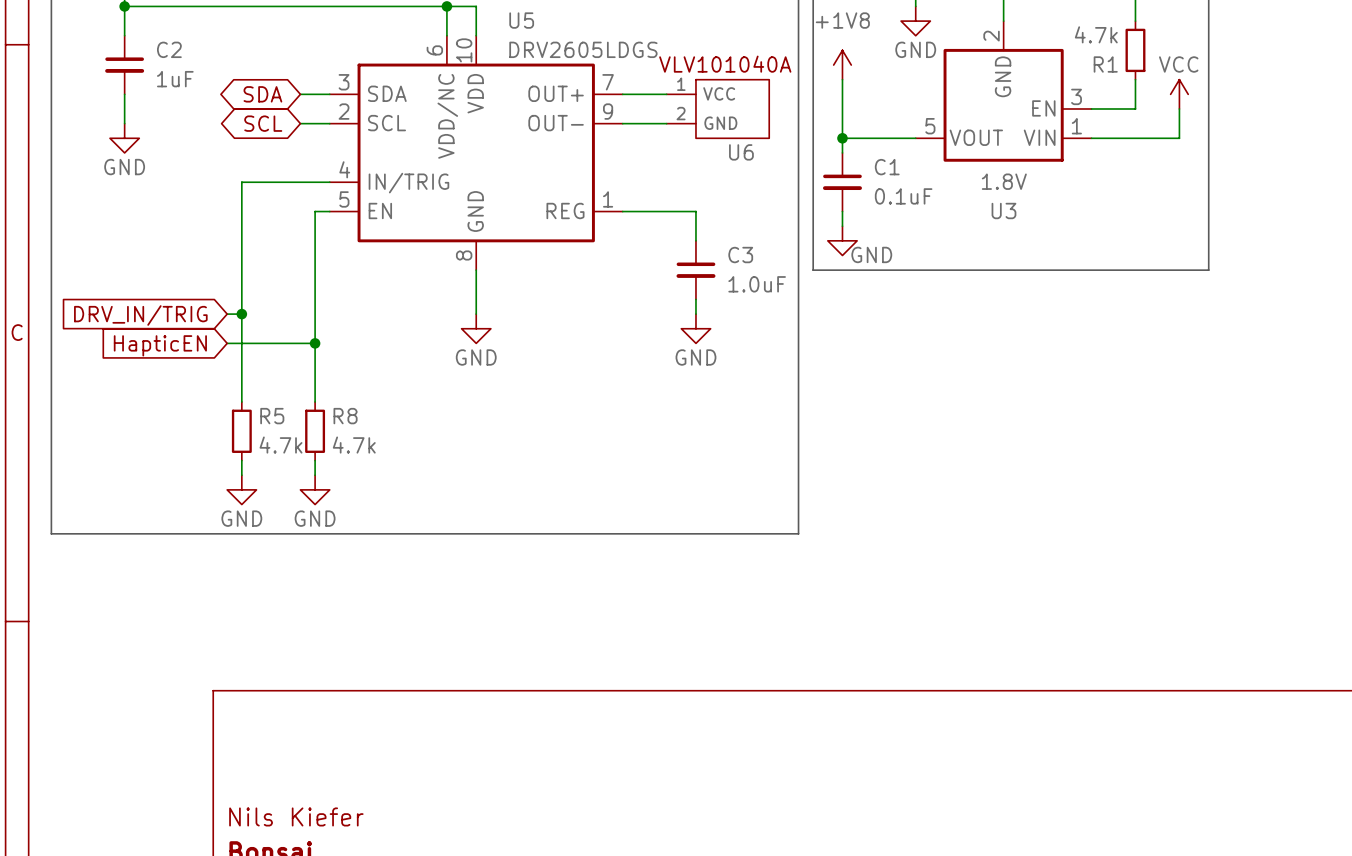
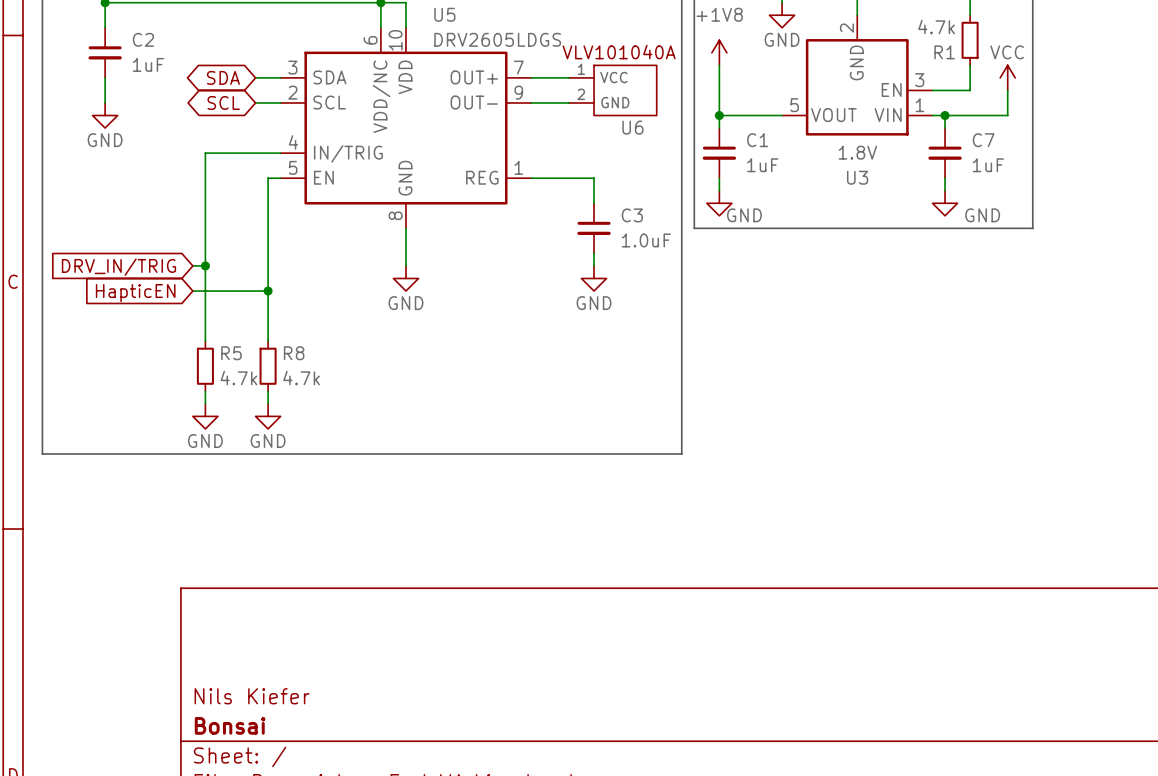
wire: none -> (945, 115) (945, 128)
junction: none -> (945, 115)
C7: none -> 1uF (945, 153)
C1 value: 0.1uF (903, 196) -> 1uF (762, 165)
wire: none -> (945, 178) (945, 190)
power symbol: none -> GND (945, 203)

